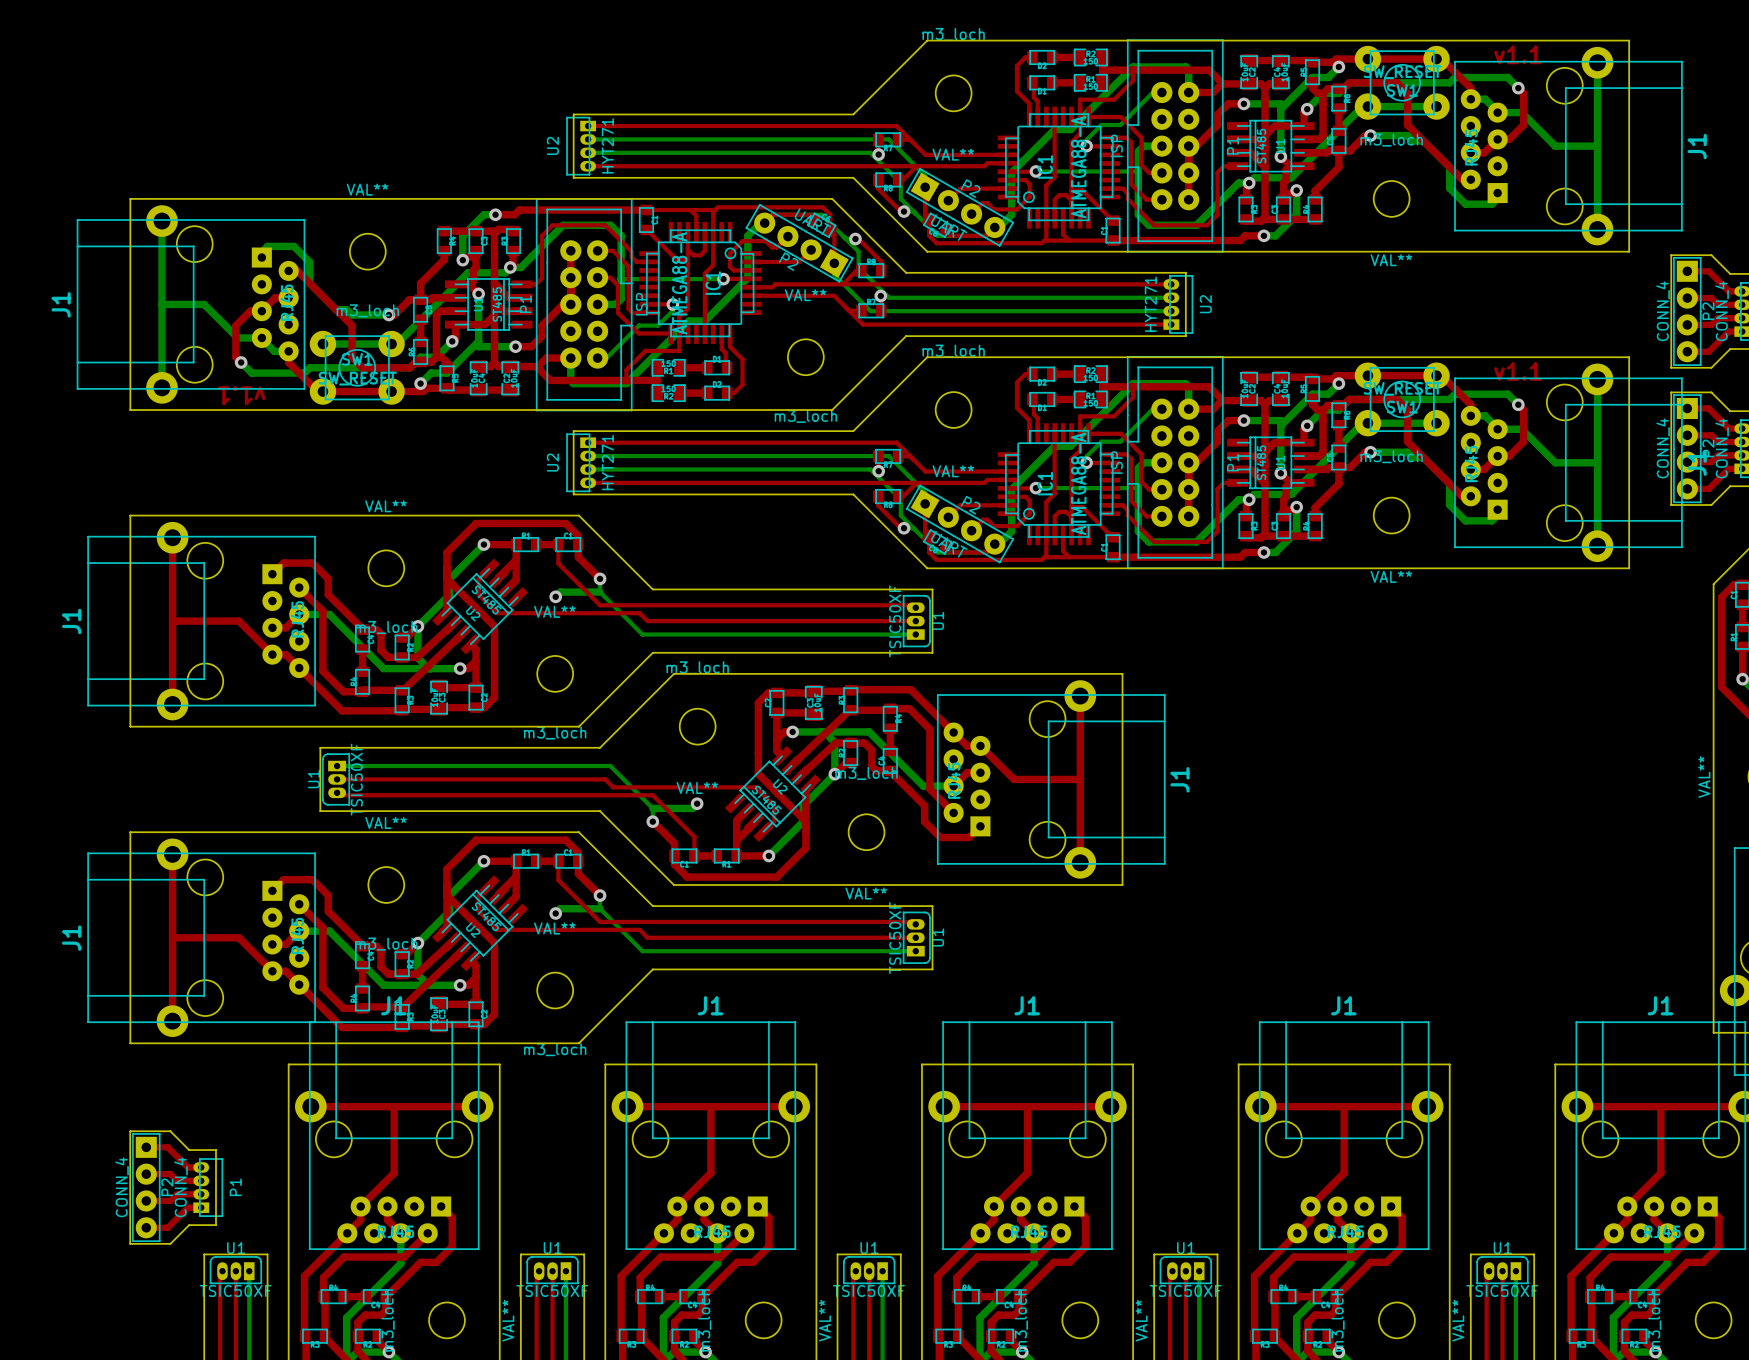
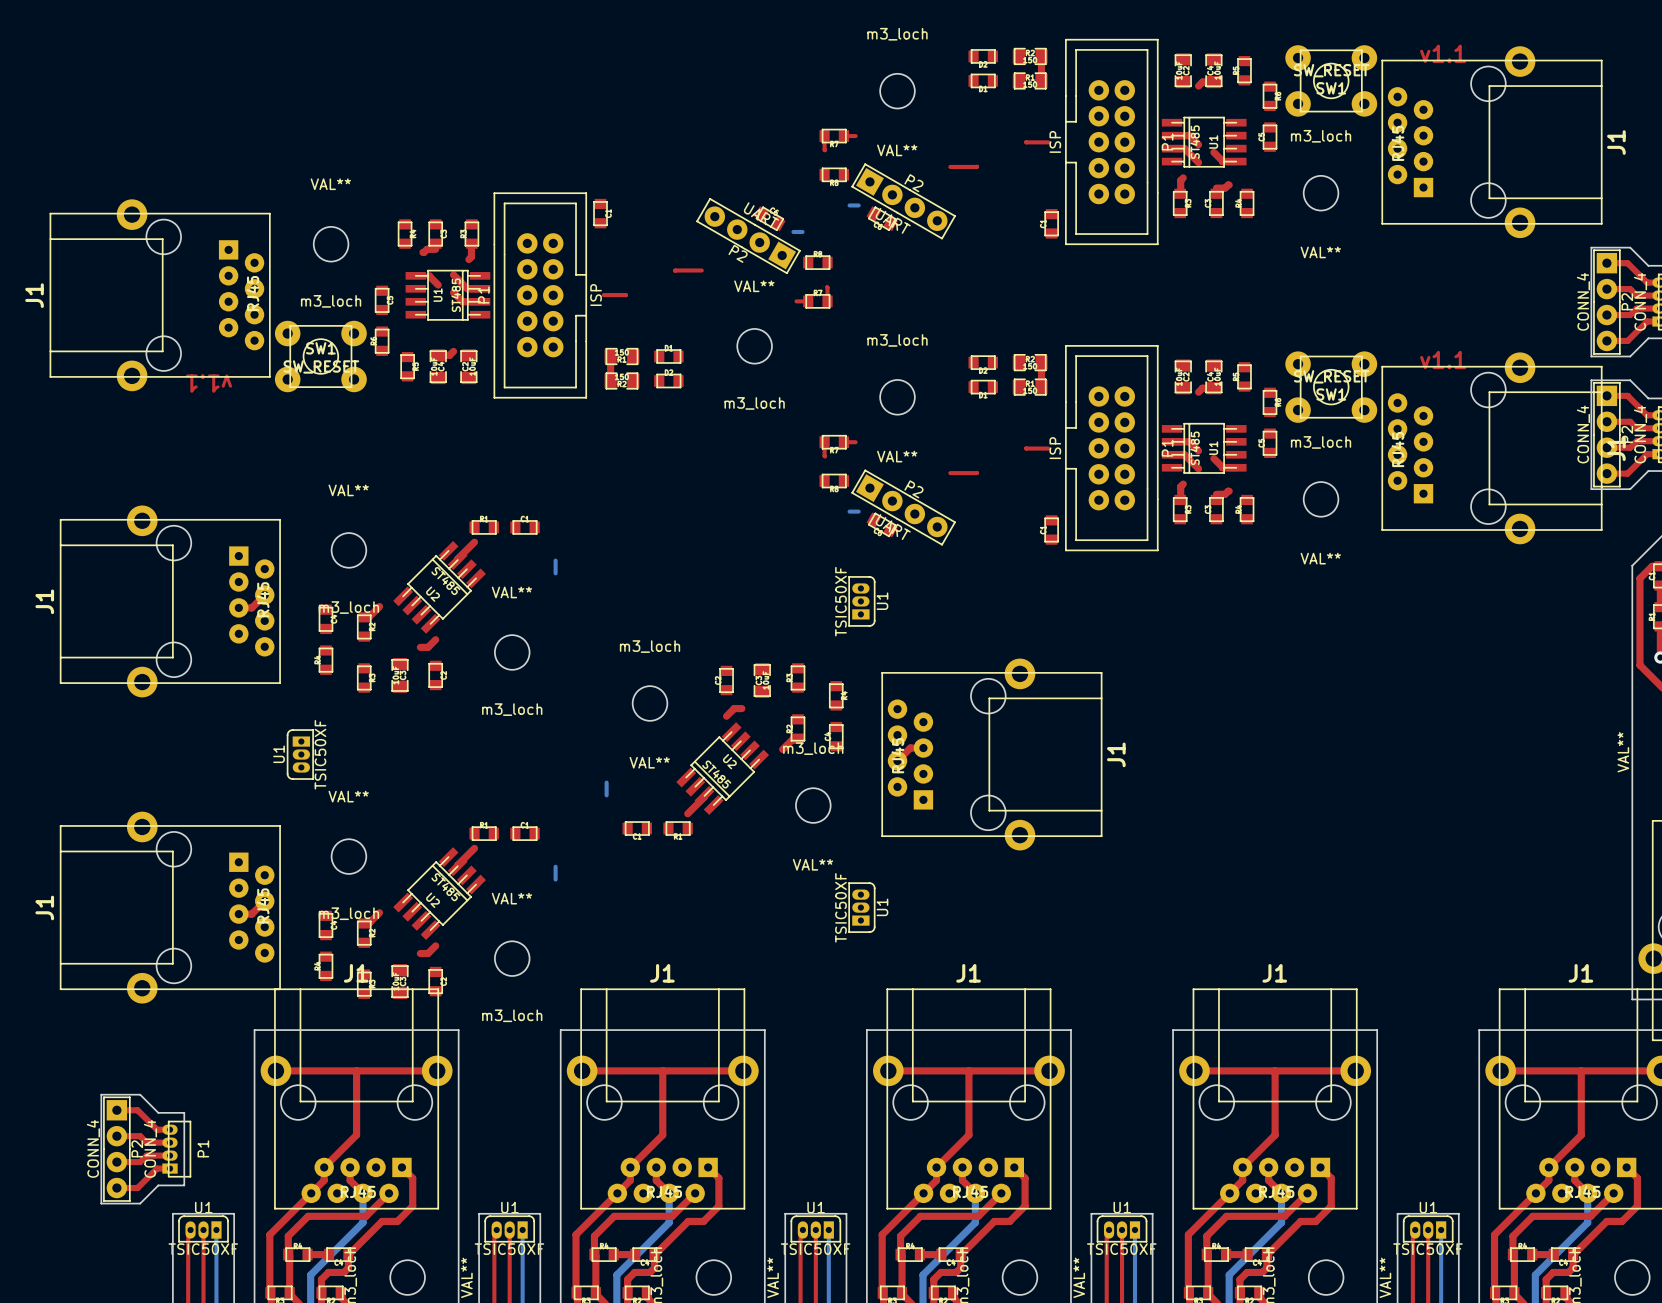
board edge: (927, 40) (1629, 40) (1629, 251) (927, 251) (853, 177) (573, 177) (573, 114) (853, 114) (927, 40) -> none
top track: (1032, 57) (1025, 57) (1016, 65) (1016, 91) (1029, 103) (1029, 117) -> none
top track: (1052, 57) (1079, 57) -> none
top track: (1249, 60) (1310, 60) (1312, 62) (1334, 62) (1338, 66) -> none
top track: (1333, 62) (1336, 59) (1441, 59) (1470, 88) (1470, 99) -> none
bottom track: (1597, 62) (1597, 229) -> none
bottom track: (1338, 66) (1328, 77) (1312, 77) (1280, 109) -> none
via: (1338, 66) -> none
top track: (1102, 70) (1209, 70) (1222, 83) -> none
top track: (1133, 70) (1133, 80) (1114, 99) (1080, 99) (1080, 133) (1071, 142) (1071, 218) -> none
top track: (1032, 82) (1033, 97) (1037, 101) (1037, 117) -> none
top track: (1052, 82) (1079, 82) -> none
top track: (1312, 82) (1312, 88) (1317, 93) (1323, 93) -> none
top track: (1518, 88) (1523, 93) (1523, 125) (1509, 139) (1497, 139) (1484, 152) (1470, 152) -> none
bottom track: (1518, 88) (1507, 77) (1454, 77) (1449, 82) (1349, 82) (1338, 93) (1323, 93) (1307, 109) -> none
via: (1518, 88) -> none
bottom track: (1161, 92) (1152, 92) (1120, 125) (1101, 125) (1086, 139) (1086, 146) -> none
top track: (1188, 92) (1213, 92) (1221, 83) (1260, 83) (1265, 88) (1265, 217) (1261, 221) (1246, 221) -> none
bottom track: (1188, 92) (1188, 69) (1185, 66) (1133, 66) (1070, 129) (1054, 129) (1011, 172) (1011, 214) (998, 227) (994, 227) (986, 235) (937, 235) (900, 198) (900, 183) (870, 152) (588, 152) -> none
top track: (1323, 93) (1323, 135) (1319, 139) (1304, 139) -> none
top track: (1323, 93) (1327, 88) (1343, 88) (1349, 82) (1396, 82) (1407, 93) (1407, 125) (1462, 179) (1470, 179) -> none
bottom track: (1470, 99) (1485, 99) (1497, 112) (1521, 112) (1555, 146) (1597, 146) -> none
top track: (1243, 103) (1228, 103) (1217, 114) (1217, 125) (1196, 146) (1188, 146) (1188, 199) -> none
bottom track: (1243, 103) (1280, 103) (1280, 156) -> none
via: (1243, 103) -> none
bottom track: (1436, 106) (1362, 106) (1291, 177) (1254, 177) (1249, 183) (1238, 183) (1196, 225) (1148, 225) (1138, 214) (1138, 151) (1143, 146) (1161, 146) -> none
top track: (1338, 108) (1338, 130) -> none
top track: (1307, 109) (1304, 112) (1304, 125) (1274, 125) (1265, 135) -> none
via: (1307, 109) -> none
top track: (1054, 117) (1054, 177) (1046, 185) (1046, 238) (1048, 240) -> none
top track: (1088, 117) (1120, 117) (1141, 137) (1141, 165) (1149, 172) (1161, 172) -> none
top track: (588, 126) (896, 126) (925, 154) (1008, 154) -> none
top track: (1370, 135) (1365, 135) (1350, 150) (1304, 152) -> none
bottom track: (1370, 135) (1407, 135) (1412, 140) (1423, 140) (1449, 167) (1449, 188) (1465, 204) (1491, 204) (1497, 198) (1497, 193) -> none
via: (1370, 135) -> none
top track: (1109, 137) (1126, 137) (1130, 141) (1130, 184) (1146, 199) (1161, 199) -> none
bottom track: (588, 139) (888, 139) (925, 175) (925, 187) -> none
U2: HYT271 (581, 146) -> none
via: (1086, 146) -> none
top track: (1338, 150) (1338, 167) (1315, 190) (1315, 199) -> none
via: (878, 154) -> none
via: (1280, 156) -> none
top track: (1008, 163) (987, 163) (984, 166) (588, 166) -> none
top track: (916, 166) (902, 179) (898, 179) -> none
top track: (1237, 166) (1223, 166) (1217, 172) (1217, 214) (1206, 225) (1154, 225) (1127, 198) (1127, 193) (1122, 188) (1109, 188) -> none
top track: (1289, 166) (1286, 169) (1286, 180) (1283, 183) (1283, 199) -> none
IC1: ATMEGA88-A (1058, 167) -> none
bottom track: (1035, 171) (1138, 171) -> none
via: (1035, 171) -> none
top track: (878, 179) (878, 188) (900, 211) (904, 211) -> none
top track: (1008, 180) (1025, 180) (1029, 184) (1029, 196) (1016, 209) (993, 209) (987, 203) (982, 203) (971, 214) -> none
via: (1249, 183) -> none
top track: (925, 187) (925, 216) (929, 220) (929, 235) (936, 243) (1041, 243) (1044, 240) (1240, 240) (1244, 235) (1263, 235) -> none
top track: (1008, 188) (960, 188) (948, 200) -> none
top track: (1071, 190) (1082, 190) (1113, 220) -> none
bottom track: (1296, 190) (1296, 214) (1275, 235) (1263, 235) -> none
via: (1296, 190) -> none
board edge: (130, 198) (130, 410) (832, 410) (906, 336) (1185, 336) (1185, 272) (906, 272) (832, 198) (130, 198) -> none
top track: (1071, 200) (1066, 195) (1059, 195) (1054, 199) (1054, 218) -> none
top track: (690, 210) (696, 216) (696, 232) -> none
top track: (711, 210) (713, 211) (713, 265) (704, 273) (704, 333) -> none
via: (904, 211) -> none
top track: (495, 214) (514, 214) (519, 210) (715, 210) (717, 207) (822, 207) (830, 214) (830, 230) (834, 234) (834, 263) -> none
bottom track: (495, 214) (483, 214) (462, 235) (462, 260) -> none
via: (495, 214) -> none
top track: (1063, 218) (1063, 234) (1069, 240) -> none
top track: (1262, 219) (1315, 219) -> none
top track: (813, 220) (807, 214) (774, 214) (764, 223) -> none
bottom track: (161, 221) (161, 387) -> none
top track: (994, 227) (985, 235) (952, 235) (946, 230) -> none
top track: (512, 229) (498, 229) (494, 233) (494, 362) (498, 366) (537, 366) (546, 358) (570, 358) -> none
top track: (646, 229) (677, 260) (687, 260) -> none
top track: (444, 231) (496, 231) -> none
top track: (687, 232) (687, 308) (679, 317) (679, 350) (645, 350) (626, 369) (626, 380) -> none
top track: (704, 232) (704, 250) (700, 255) (693, 255) (687, 249) -> none
via: (1263, 235) -> none
top track: (787, 236) (776, 247) (772, 247) (765, 241) (742, 241) (729, 253) (729, 266) (733, 270) (751, 270) -> none
top track: (855, 239) (858, 239) (881, 261) (881, 270) -> none
via: (855, 239) -> none
top track: (811, 249) (799, 261) (751, 261) -> none
top track: (570, 250) (570, 304) (563, 304) (541, 325) (541, 336) (531, 346) (515, 346) -> none
top track: (597, 250) (612, 250) (628, 266) (628, 308) (632, 312) (649, 312) -> none
top track: (444, 251) (444, 259) (420, 283) (420, 299) -> none
top track: (476, 251) (473, 280) (469, 284) (455, 284) -> none
bottom track: (261, 257) (261, 252) (267, 246) (293, 246) (309, 262) (309, 283) (336, 309) (346, 309) (351, 315) (388, 315) -> none
via: (462, 260) -> none
top track: (649, 261) (636, 261) (631, 256) (631, 251) (605, 225) (552, 225) (541, 235) (541, 278) (535, 284) (521, 284) -> none
bottom track: (834, 263) (834, 274) (870, 311) (1171, 311) -> none
via: (510, 267) -> none
top track: (288, 270) (297, 270) (351, 325) (351, 357) (362, 367) (410, 367) (415, 361) (431, 361) (436, 357) -> none
top track: (861, 270) (856, 270) (842, 284) -> none
top track: (597, 277) (610, 277) (617, 285) (617, 312) (638, 333) (670, 333) -> none
bottom track: (621, 279) (723, 279) -> none
via: (723, 279) -> none
IC1: ATMEGA88-A (700, 283) -> none
top track: (1171, 284) (775, 284) (772, 287) (751, 287) -> none
bottom track: (478, 293) (478, 346) (515, 346) -> none
via: (478, 293) -> none
top track: (751, 295) (834, 295) (862, 324) (1171, 324) -> none
via: (880, 296) -> none
top track: (288, 297) (275, 297) (261, 311) (250, 311) (235, 325) (235, 357) (241, 362) -> none
top track: (455, 297) (409, 299) (394, 315) (388, 315) -> none
bottom track: (1171, 297) (888, 297) (858, 267) (858, 251) (821, 214) (773, 214) (764, 223) (760, 223) (747, 235) (747, 278) (704, 321) (689, 321) (626, 383) (573, 383) (570, 380) (570, 358) -> none
bottom track: (161, 304) (204, 304) (237, 337) (261, 337) (274, 351) (288, 351) -> none
bottom track: (597, 304) (615, 304) (621, 299) (621, 235) (610, 225) (563, 225) (520, 267) (510, 267) (505, 272) (468, 272) (396, 344) (322, 344) -> none
bottom track: (672, 304) (672, 310) (658, 325) (639, 325) (606, 358) (597, 358) -> none
via: (672, 304) -> none
U2: HYT271 (1178, 304) -> none
top track: (455, 311) (440, 311) (436, 315) (436, 357) -> none
via: (388, 315) -> none
top track: (494, 315) (484, 324) (455, 324) (455, 338) (452, 341) -> none
top track: (420, 319) (420, 341) -> none
top track: (721, 333) (721, 349) (725, 353) (727, 367) -> none
top track: (730, 333) (730, 346) (742, 359) (742, 384) (734, 393) (727, 393) -> none
bottom track: (452, 341) (436, 357) (420, 357) (410, 367) (309, 367) (304, 373) (251, 373) (241, 362) -> none
via: (452, 341) -> none
bottom track: (478, 341) (446, 373) (431, 373) (420, 383) -> none
via: (515, 346) -> none
top track: (288, 351) (288, 362) (317, 391) (423, 391) (426, 388) -> none
top track: (436, 357) (441, 357) (446, 362) (446, 368) -> none
board edge: (927, 357) (1629, 357) (1629, 568) (927, 568) (853, 494) (573, 494) (573, 431) (853, 431) (927, 357) -> none
via: (241, 362) -> none
top track: (536, 366) (550, 380) (656, 380) -> none
top track: (680, 367) (707, 367) -> none
top track: (1032, 374) (1025, 374) (1016, 382) (1016, 407) (1029, 420) (1029, 433) -> none
top track: (1052, 374) (1079, 374) -> none
top track: (1249, 377) (1310, 377) (1312, 378) (1334, 378) (1338, 383) -> none
top track: (1333, 378) (1336, 375) (1441, 375) (1470, 404) (1470, 415) -> none
bottom track: (1597, 379) (1597, 546) -> none
top track: (420, 383) (425, 388) (446, 388) (448, 390) (510, 390) -> none
via: (420, 383) -> none
bottom track: (1338, 383) (1328, 394) (1312, 394) (1280, 425) -> none
via: (1338, 383) -> none
top track: (1102, 386) (1209, 386) (1222, 400) -> none
top track: (1133, 386) (1133, 397) (1114, 416) (1080, 416) (1080, 450) (1071, 458) (1071, 534) -> none
top track: (680, 393) (707, 393) -> none
top track: (1312, 398) (1312, 404) (1317, 410) (1323, 410) -> none
top track: (1032, 399) (1033, 414) (1037, 418) (1037, 433) -> none
top track: (1052, 399) (1079, 399) -> none
top track: (1518, 404) (1523, 410) (1523, 441) (1509, 456) (1497, 456) (1484, 469) (1470, 469) -> none
bottom track: (1518, 404) (1507, 394) (1454, 394) (1449, 399) (1349, 399) (1338, 410) (1323, 410) (1307, 425) -> none
via: (1518, 404) -> none
bottom track: (1161, 409) (1152, 409) (1120, 441) (1101, 441) (1086, 456) (1086, 462) -> none
top track: (1188, 409) (1213, 409) (1221, 400) (1260, 400) (1265, 404) (1265, 534) (1261, 537) (1246, 537) -> none
bottom track: (1188, 409) (1188, 386) (1185, 383) (1133, 383) (1070, 446) (1054, 446) (1011, 489) (1011, 531) (998, 544) (994, 544) (986, 552) (937, 552) (900, 515) (900, 499) (870, 469) (588, 469) -> none
top track: (1323, 410) (1323, 452) (1319, 456) (1304, 456) -> none
top track: (1323, 410) (1327, 405) (1343, 405) (1349, 399) (1396, 399) (1407, 410) (1407, 441) (1462, 496) (1470, 496) -> none
bottom track: (1470, 415) (1485, 415) (1497, 429) (1521, 429) (1555, 462) (1597, 462) -> none
top track: (1243, 420) (1228, 420) (1217, 431) (1217, 441) (1196, 462) (1188, 462) (1188, 516) -> none
bottom track: (1243, 420) (1280, 420) (1280, 473) -> none
via: (1243, 420) -> none
bottom track: (1436, 423) (1362, 423) (1291, 494) (1254, 494) (1249, 499) (1238, 499) (1196, 541) (1148, 541) (1138, 531) (1138, 468) (1143, 462) (1161, 462) -> none
top track: (1307, 425) (1304, 429) (1304, 442) (1274, 442) (1265, 452) -> none
via: (1307, 425) -> none
top track: (1338, 425) (1338, 447) -> none
top track: (1054, 433) (1054, 493) (1046, 502) (1046, 555) (1048, 557) -> none
top track: (1088, 433) (1120, 433) (1141, 454) (1141, 481) (1149, 489) (1161, 489) -> none
top track: (588, 442) (896, 442) (925, 471) (1008, 471) -> none
top track: (1370, 452) (1365, 452) (1350, 467) (1304, 469) -> none
bottom track: (1370, 452) (1407, 452) (1412, 457) (1423, 457) (1449, 483) (1449, 505) (1465, 520) (1491, 520) (1497, 515) (1497, 509) -> none
via: (1370, 452) -> none
top track: (1109, 454) (1126, 454) (1130, 458) (1130, 500) (1146, 516) (1161, 516) -> none
bottom track: (588, 456) (888, 456) (925, 492) (925, 503) -> none
U2: HYT271 (581, 462) -> none
via: (1086, 462) -> none
top track: (1338, 467) (1338, 483) (1315, 507) (1315, 516) -> none
via: (878, 471) -> none
via: (1280, 473) -> none
top track: (1008, 479) (987, 479) (984, 482) (588, 482) -> none
top track: (916, 482) (902, 496) (898, 496) -> none
top track: (1237, 482) (1223, 482) (1217, 489) (1217, 531) (1206, 541) (1154, 541) (1127, 515) (1127, 510) (1122, 505) (1109, 505) -> none
top track: (1289, 482) (1286, 486) (1286, 497) (1283, 499) (1283, 516) -> none
IC1: ATMEGA88-A (1058, 484) -> none
bottom track: (1035, 488) (1138, 488) -> none
via: (1035, 488) -> none
top track: (878, 496) (878, 505) (900, 528) (904, 528) -> none
top track: (1008, 496) (1025, 496) (1029, 500) (1029, 513) (1016, 526) (993, 526) (987, 519) (982, 519) (971, 530) -> none
via: (1249, 499) -> none
top track: (925, 503) (925, 532) (929, 536) (929, 552) (936, 559) (1041, 559) (1044, 557) (1240, 557) (1244, 552) (1263, 552) -> none
top track: (1008, 505) (960, 505) (948, 517) -> none
top track: (1071, 507) (1082, 507) (1113, 537) -> none
bottom track: (1296, 507) (1296, 531) (1275, 552) (1263, 552) -> none
via: (1296, 507) -> none
board edge: (130, 515) (130, 726) (578, 726) (652, 652) (932, 652) (932, 589) (652, 589) (578, 515) (130, 515) -> none
top track: (1071, 517) (1066, 511) (1059, 511) (1054, 516) (1054, 534) -> none
via: (904, 528) -> none
top track: (1063, 534) (1063, 551) (1069, 557) -> none
top track: (1262, 536) (1315, 536) -> none
top track: (172, 537) (172, 704) -> none
top track: (483, 544) (516, 544) (516, 579) (508, 587) -> none
bottom track: (483, 544) (449, 578) (449, 594) (417, 626) (417, 658) (428, 668) -> none
via: (483, 544) -> none
top track: (536, 544) (558, 544) (558, 563) (600, 605) (913, 605) (915, 607) -> none
top track: (994, 544) (985, 552) (952, 552) (946, 546) -> none
via: (1263, 552) -> none
top track: (489, 568) (478, 578) (478, 594) (497, 613) (639, 613) (647, 621) (917, 621) -> none
top track: (272, 574) (283, 563) (312, 563) (328, 578) (328, 594) (362, 629) (376, 629) (381, 634) (381, 650) (388, 657) (417, 657) (451, 625) -> none
top track: (446, 578) (494, 626) (494, 697) (484, 707) (342, 710) (285, 654) (272, 654) (238, 621) (172, 621) -> none
top track: (600, 578) (578, 557) (578, 536) (565, 523) (476, 523) (446, 552) (446, 610) (442, 615) -> none
via: (600, 578) -> none
top track: (299, 587) (322, 611) (322, 671) (343, 691) (403, 690) (461, 634) -> none
bottom track: (555, 596) (560, 592) (600, 592) (642, 634) (915, 634) -> none
via: (555, 596) -> none
bottom track: (299, 614) (329, 614) (383, 668) (460, 668) -> none
via: (417, 626) -> none
top track: (470, 644) (476, 649) (476, 687) (440, 687) (439, 685) -> none
top track: (362, 649) (362, 671) -> none
via: (460, 668) -> none
board edge: (673, 673) (1122, 673) (1122, 884) (673, 884) (600, 811) (320, 811) (320, 747) (600, 747) (673, 673) -> none
top track: (1080, 696) (1080, 862) -> none
top track: (813, 714) (812, 712) (776, 712) (776, 750) (782, 756) -> none
top track: (890, 728) (890, 750) -> none
bottom track: (792, 731) (869, 731) (923, 786) (953, 786) -> none
via: (792, 731) -> none
bottom track: (824, 731) (834, 742) (834, 774) (803, 805) (803, 821) (768, 855) -> none
top track: (791, 765) (849, 710) (909, 708) (929, 729) (929, 789) (953, 812) -> none
bottom track: (337, 766) (610, 766) (652, 808) (692, 808) (697, 803) -> none
via: (834, 774) -> none
top track: (801, 775) (835, 743) (864, 743) (871, 750) (871, 766) (876, 770) (890, 770) (924, 805) (924, 821) (940, 837) (969, 837) (980, 826) -> none
top track: (335, 779) (605, 779) (613, 787) (755, 787) (774, 805) (774, 821) (763, 831) -> none
top track: (1080, 779) (1013, 779) (980, 745) (967, 745) (910, 689) (768, 692) (758, 702) (758, 774) (805, 821) -> none
top track: (810, 784) (805, 789) (805, 848) (776, 877) (687, 877) (674, 864) (674, 843) (652, 821) -> none
top track: (337, 792) (339, 795) (652, 795) (694, 836) (694, 855) (716, 855) -> none
via: (697, 803) -> none
top track: (744, 812) (736, 820) (736, 855) (768, 855) -> none
via: (652, 821) -> none
board edge: (130, 832) (578, 832) (652, 906) (932, 906) (932, 969) (652, 969) (578, 1043) (130, 1043) (130, 832) -> none
top track: (172, 854) (172, 1021) -> none
via: (768, 855) -> none
top track: (483, 861) (516, 861) (516, 896) (508, 904) -> none
bottom track: (483, 861) (449, 895) (449, 911) (417, 943) (417, 974) (428, 985) -> none
via: (483, 861) -> none
top track: (536, 861) (558, 861) (558, 880) (600, 921) (913, 921) (915, 924) -> none
top track: (489, 885) (478, 895) (478, 911) (497, 929) (639, 929) (647, 937) (917, 937) -> none
top track: (272, 890) (283, 879) (312, 879) (328, 895) (328, 911) (362, 946) (376, 946) (381, 950) (381, 966) (388, 974) (417, 974) (451, 942) -> none
top track: (446, 895) (494, 943) (494, 1014) (484, 1024) (342, 1027) (285, 971) (272, 971) (238, 937) (172, 937) -> none
top track: (600, 895) (578, 873) (578, 852) (565, 840) (476, 840) (446, 869) (446, 927) (442, 932) -> none
via: (600, 895) -> none
top track: (299, 904) (322, 928) (322, 987) (343, 1008) (403, 1006) (461, 951) -> none
bottom track: (555, 913) (560, 908) (600, 908) (642, 951) (915, 951) -> none
via: (555, 913) -> none
bottom track: (299, 931) (329, 931) (383, 985) (460, 985) -> none
via: (417, 943) -> none
top track: (470, 960) (476, 966) (476, 1004) (440, 1004) (439, 1002) -> none
top track: (362, 966) (362, 988) -> none
via: (460, 985) -> none

